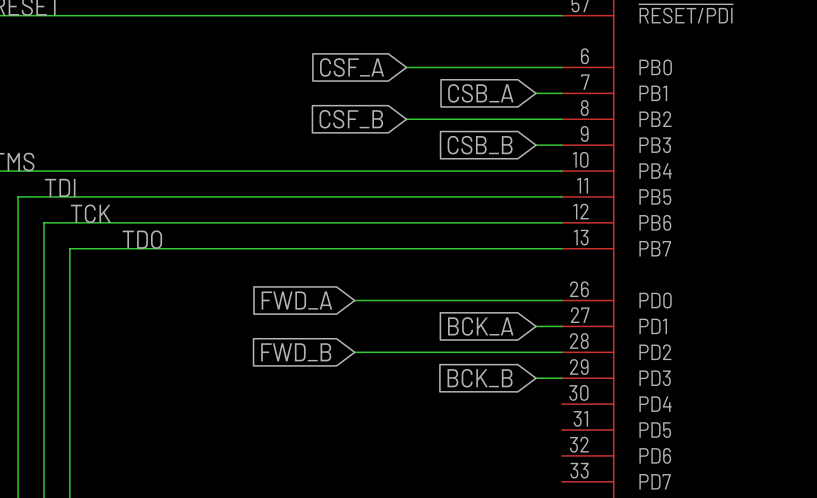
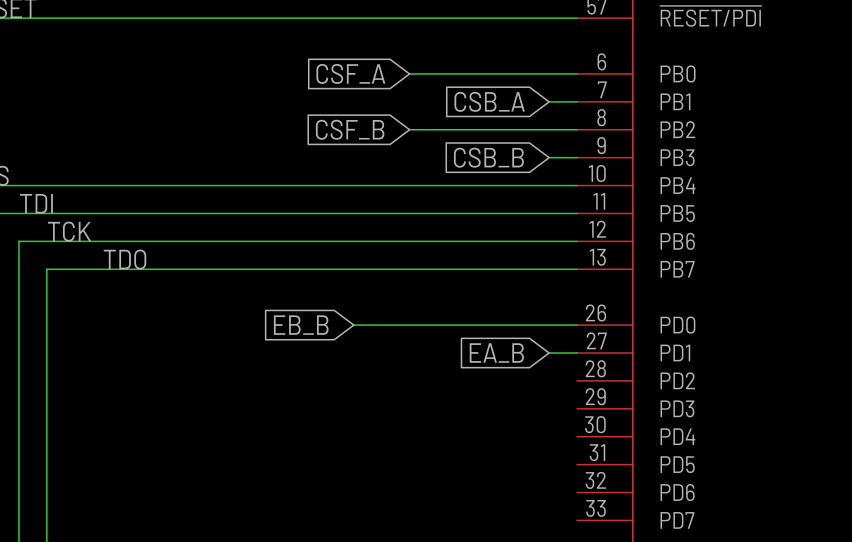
global label: FWD_A (296, 300) -> EB_B (301, 325)
global label: BCK_A (480, 326) -> EA_B (496, 353)
global label: FWD_B (296, 352) -> none
wire: (354, 352) (561, 352) -> none
global label: BCK_B (480, 378) -> none
wire: (536, 378) (561, 378) -> none

